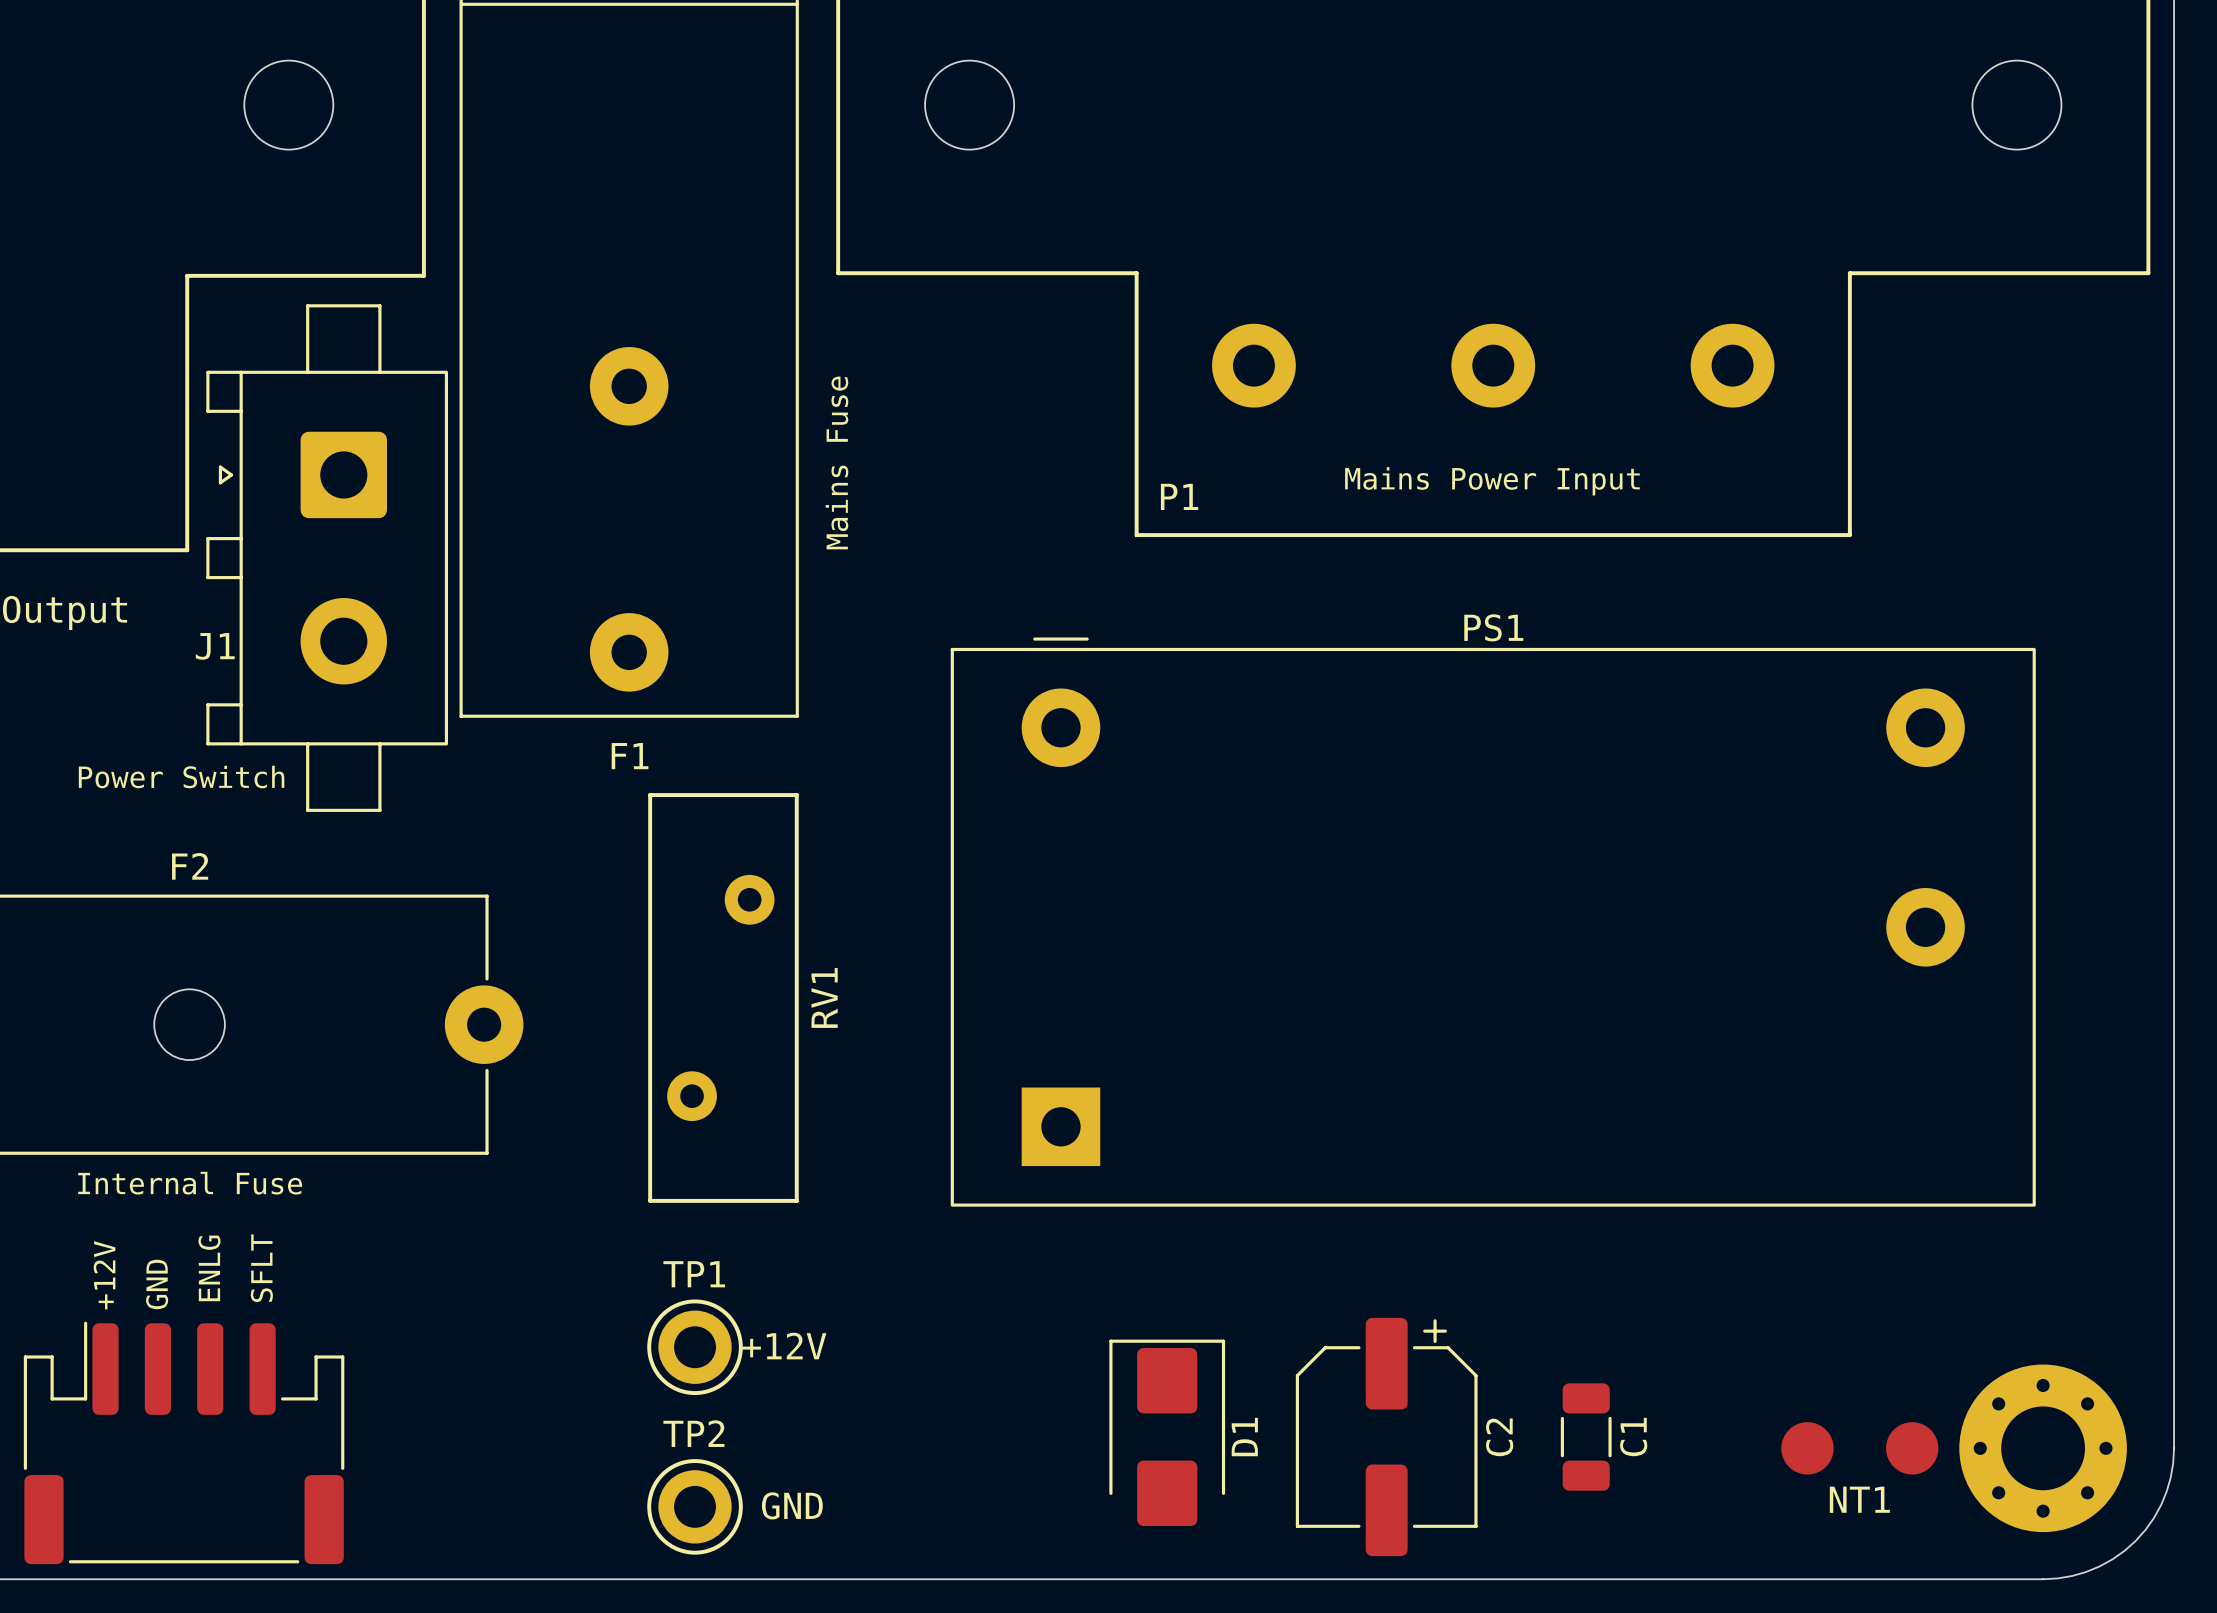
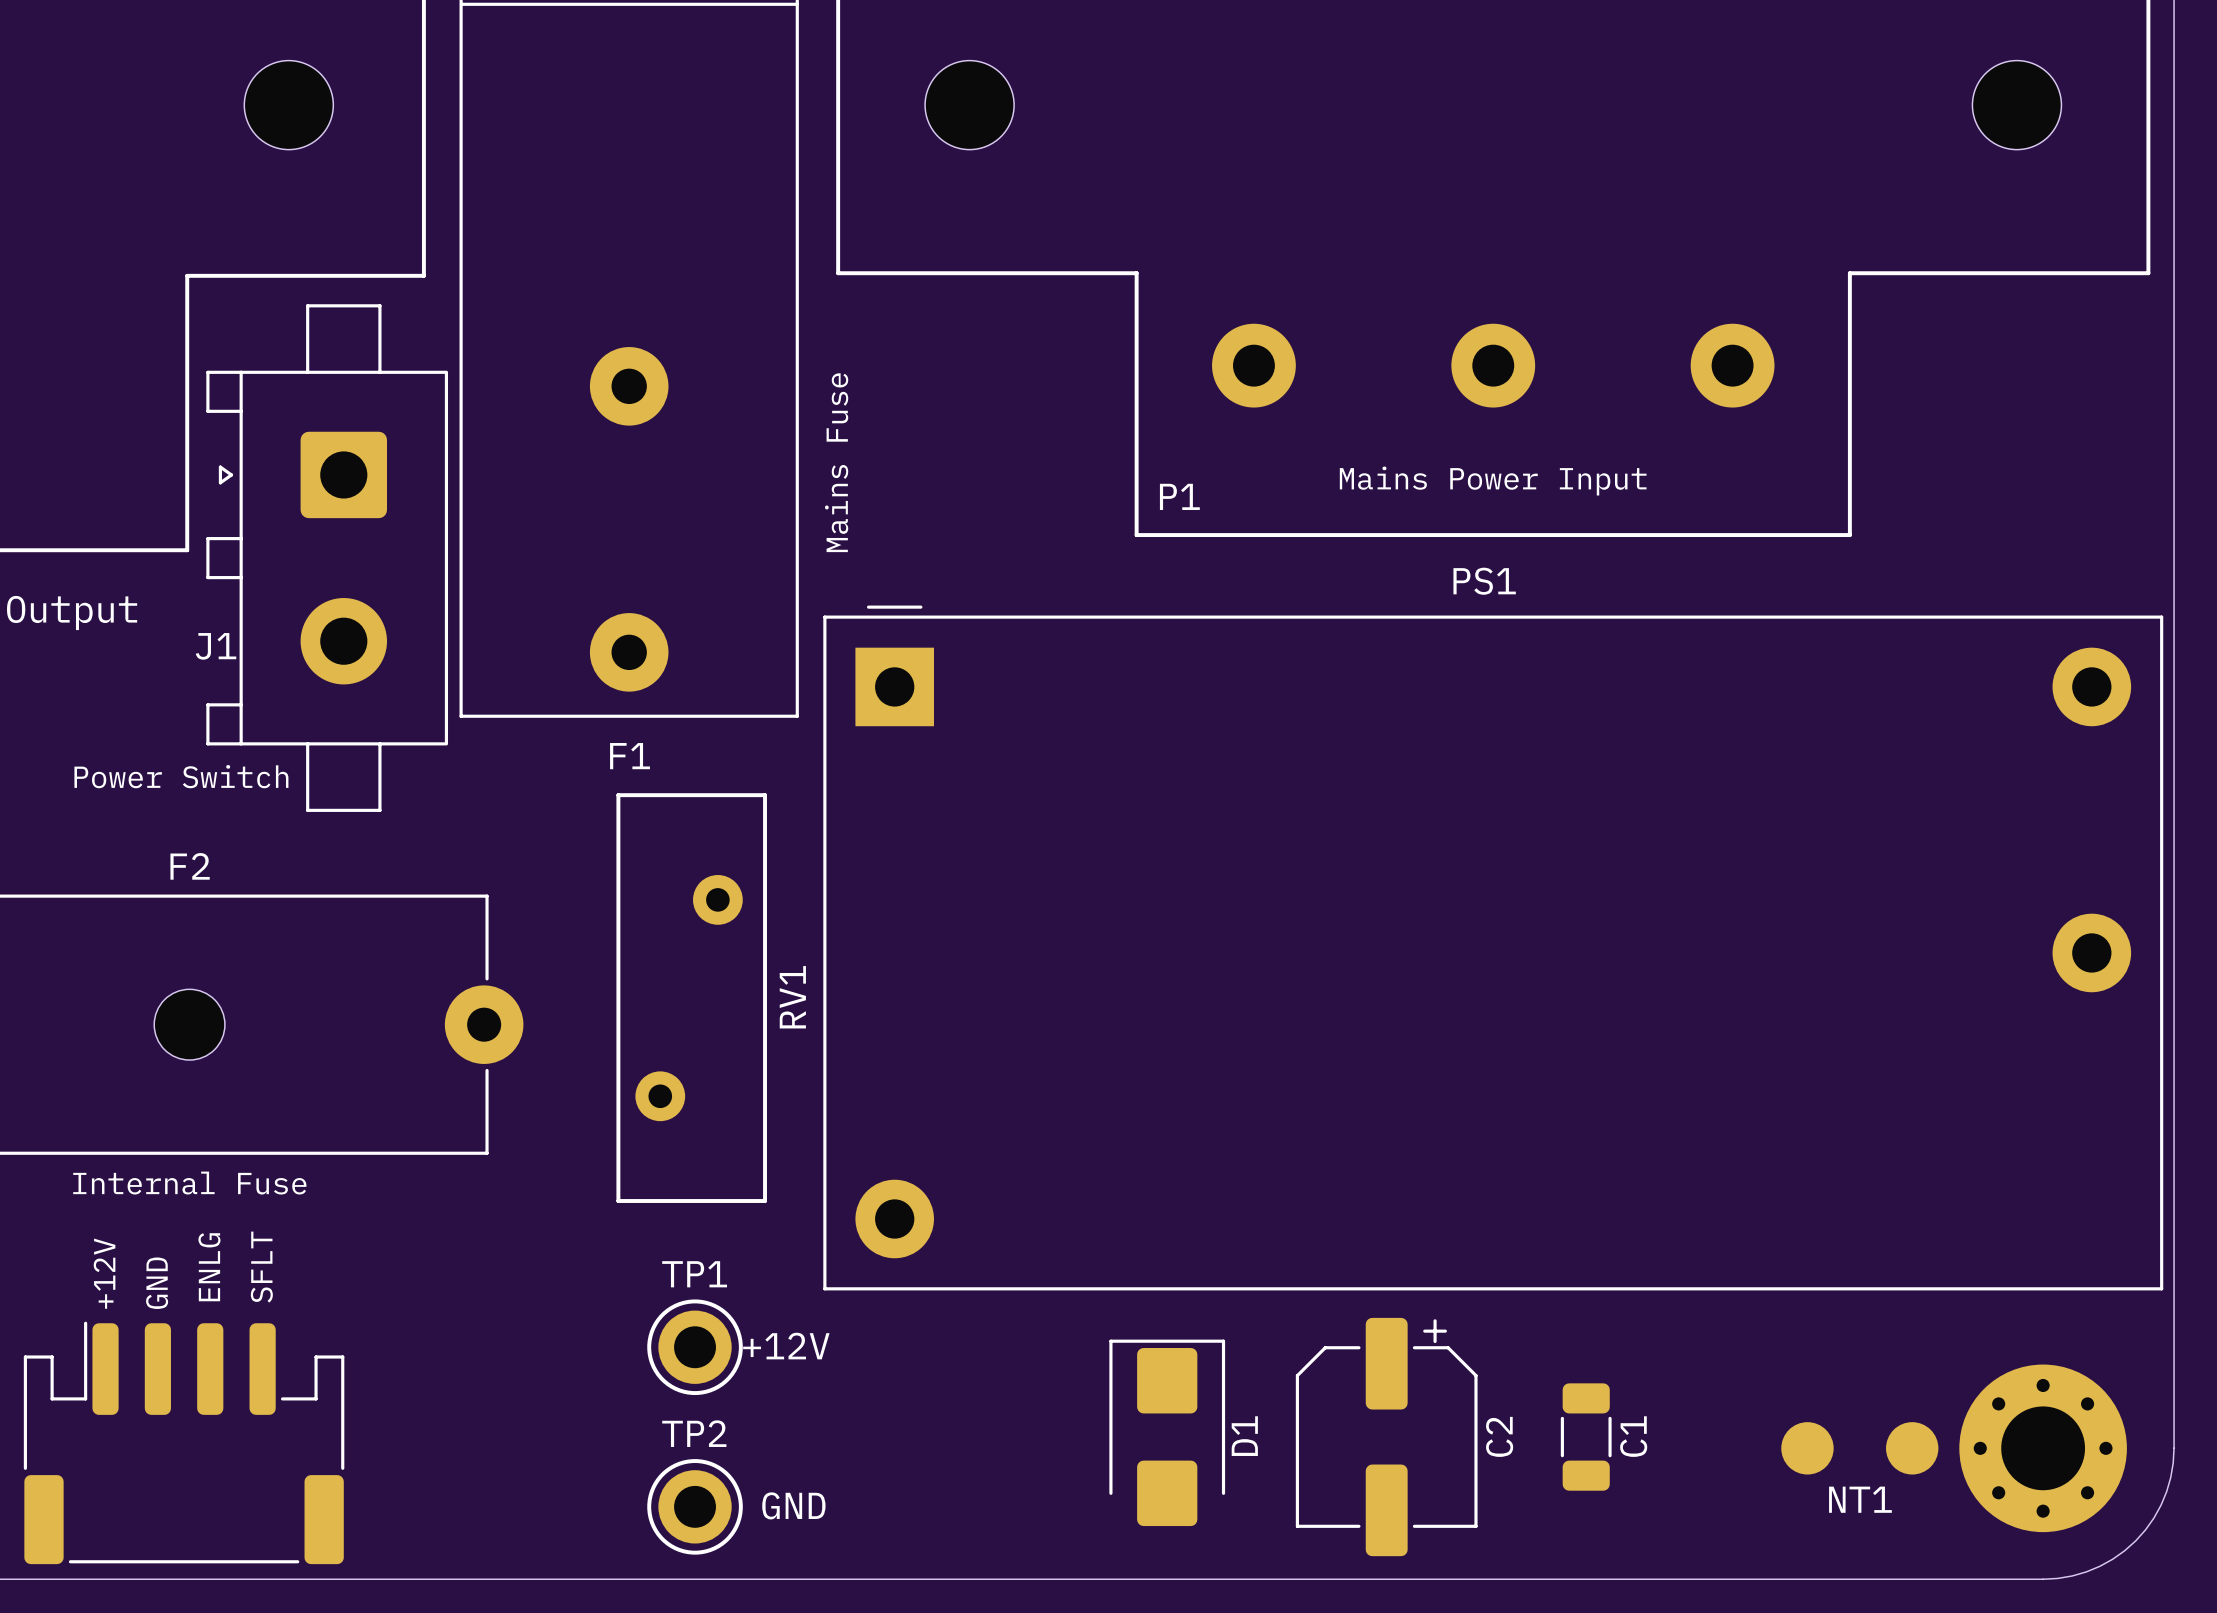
PS1 name position: PS1 (1493, 627) -> PS1 (1484, 581)
PS1 footprint: [950, 637, 2036, 1207] -> [823, 605, 2164, 1291]
RV1 position: (723, 997) -> (691, 998)

